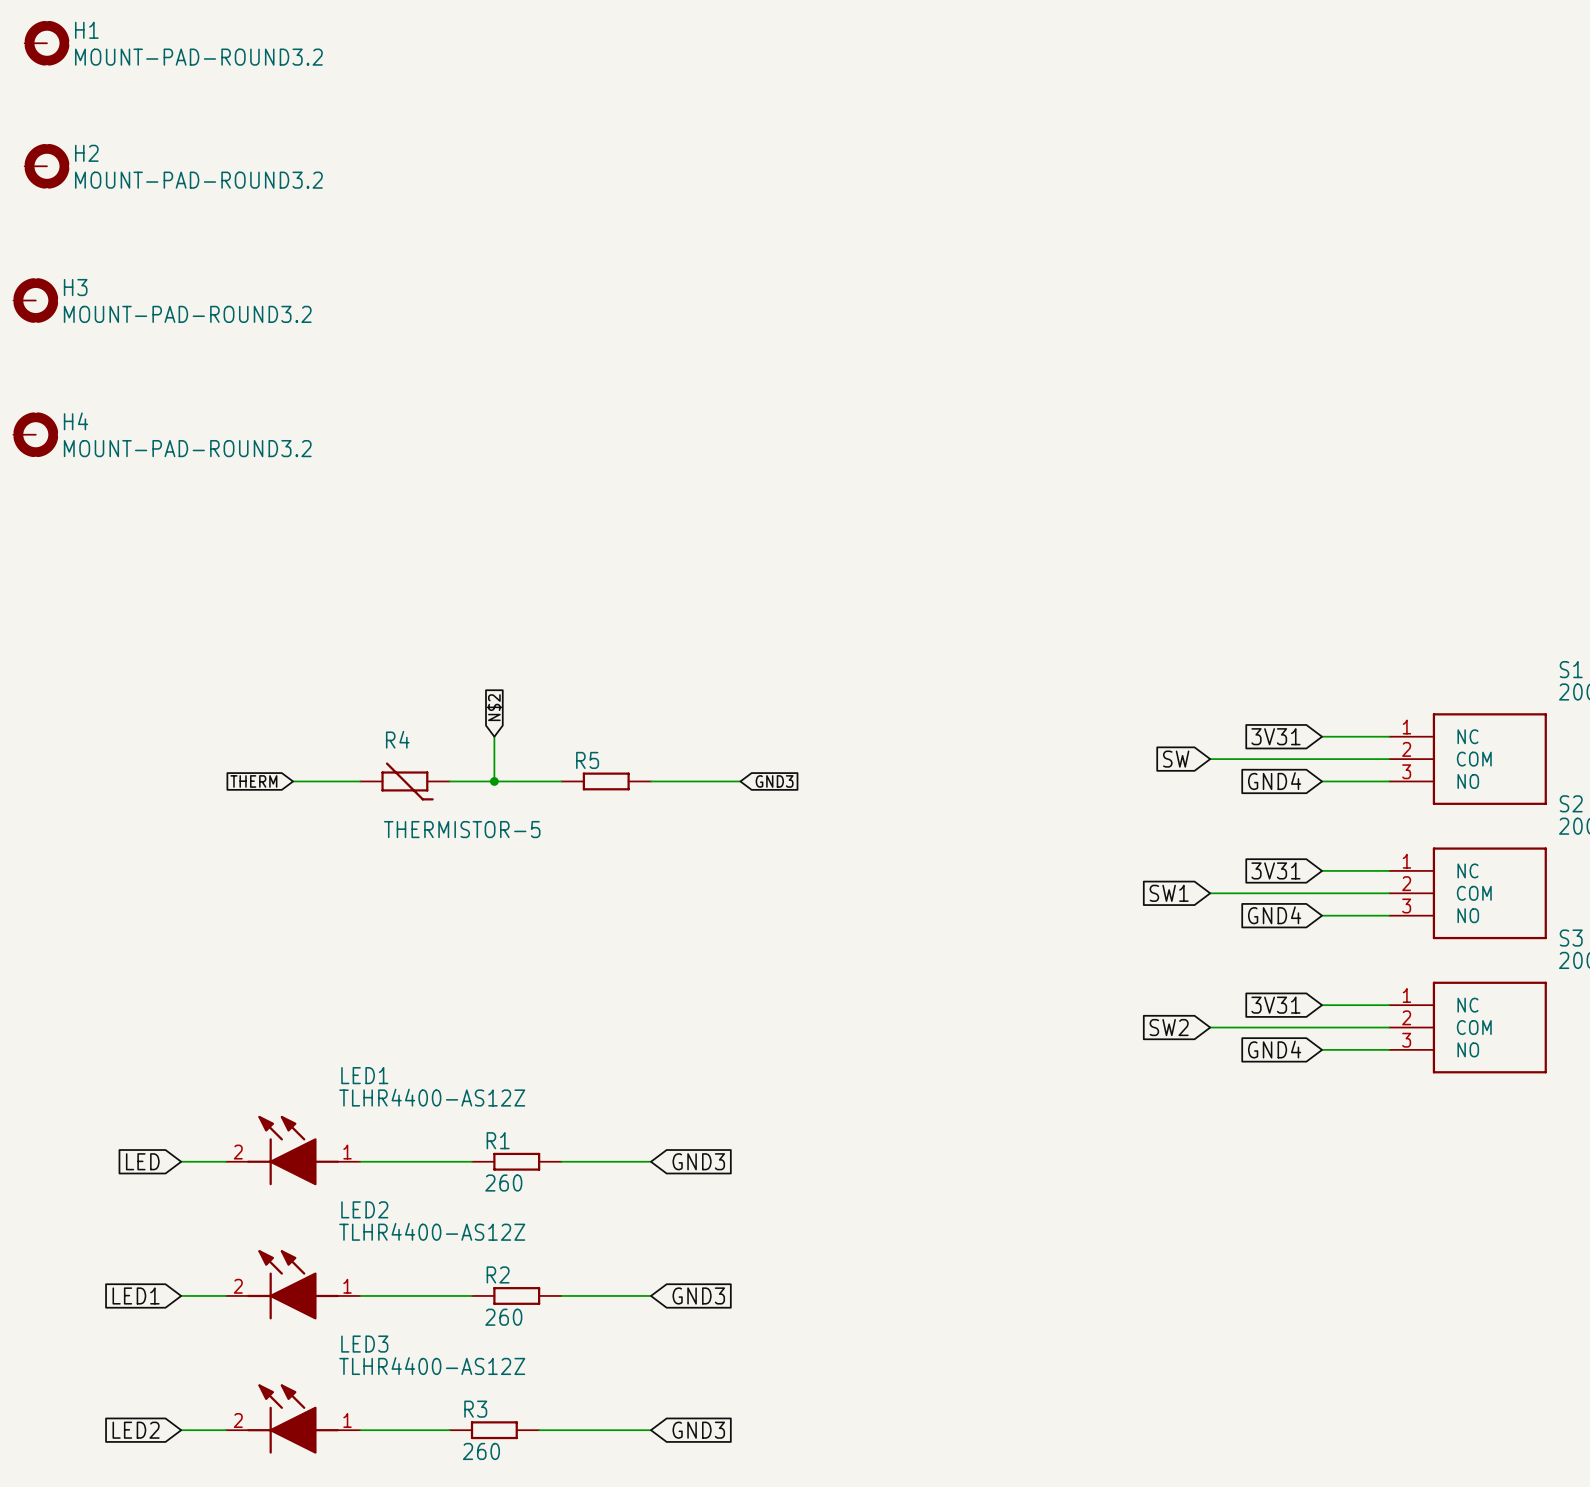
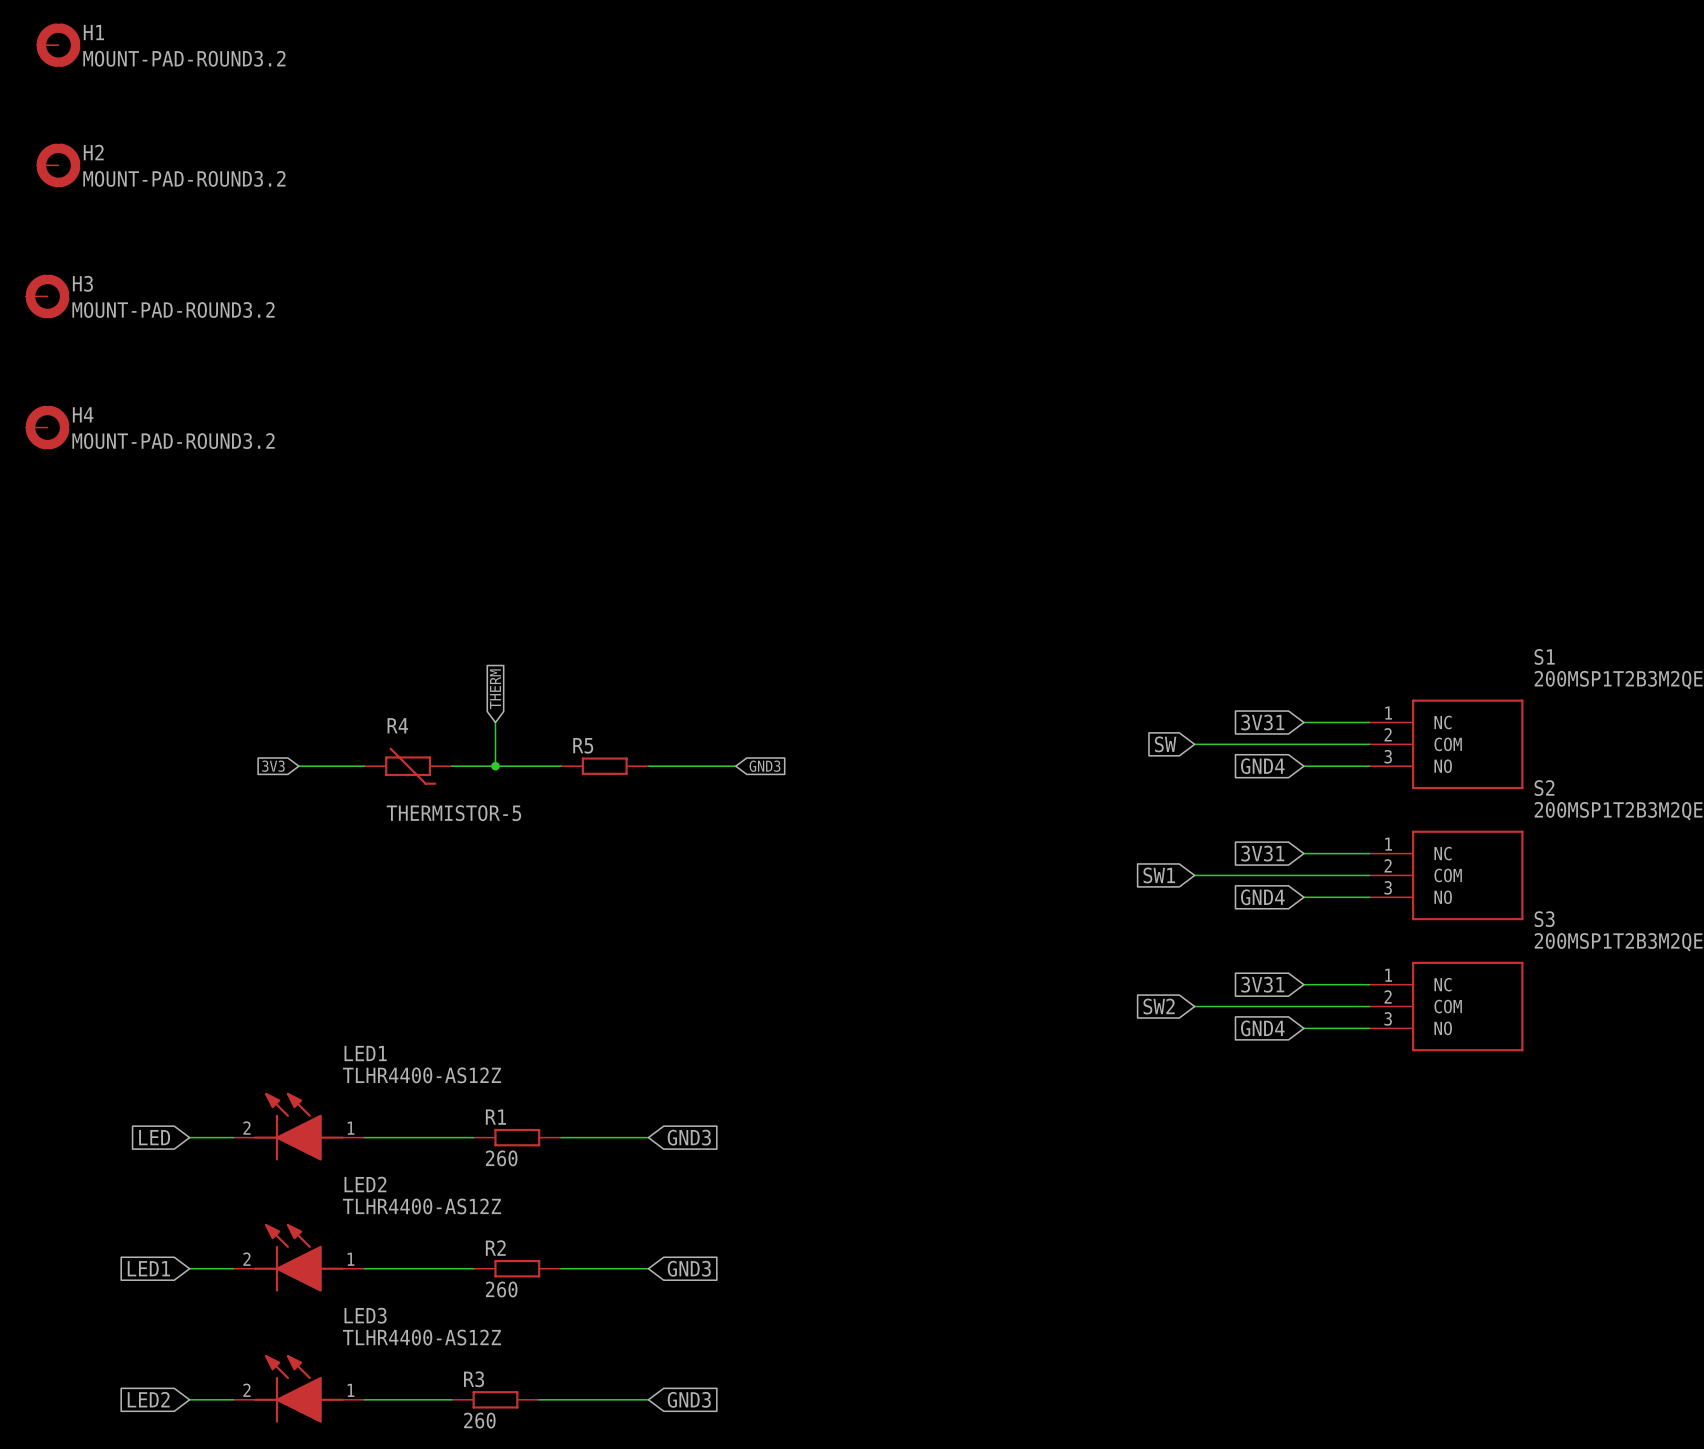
global label: N$2 (494, 707) -> THERM (495, 689)
global label: THERM (253, 781) -> 3V3 (273, 766)

